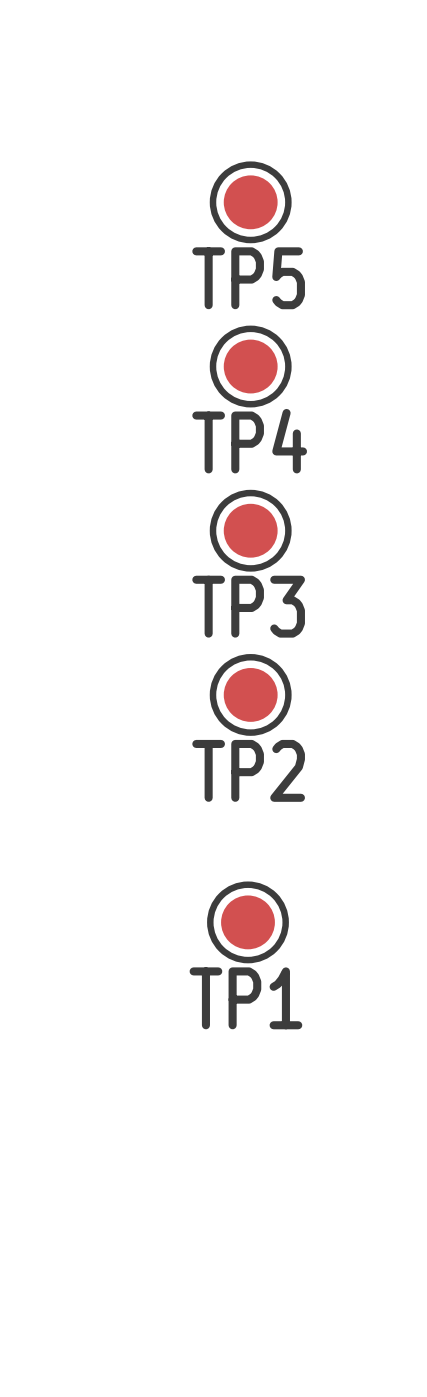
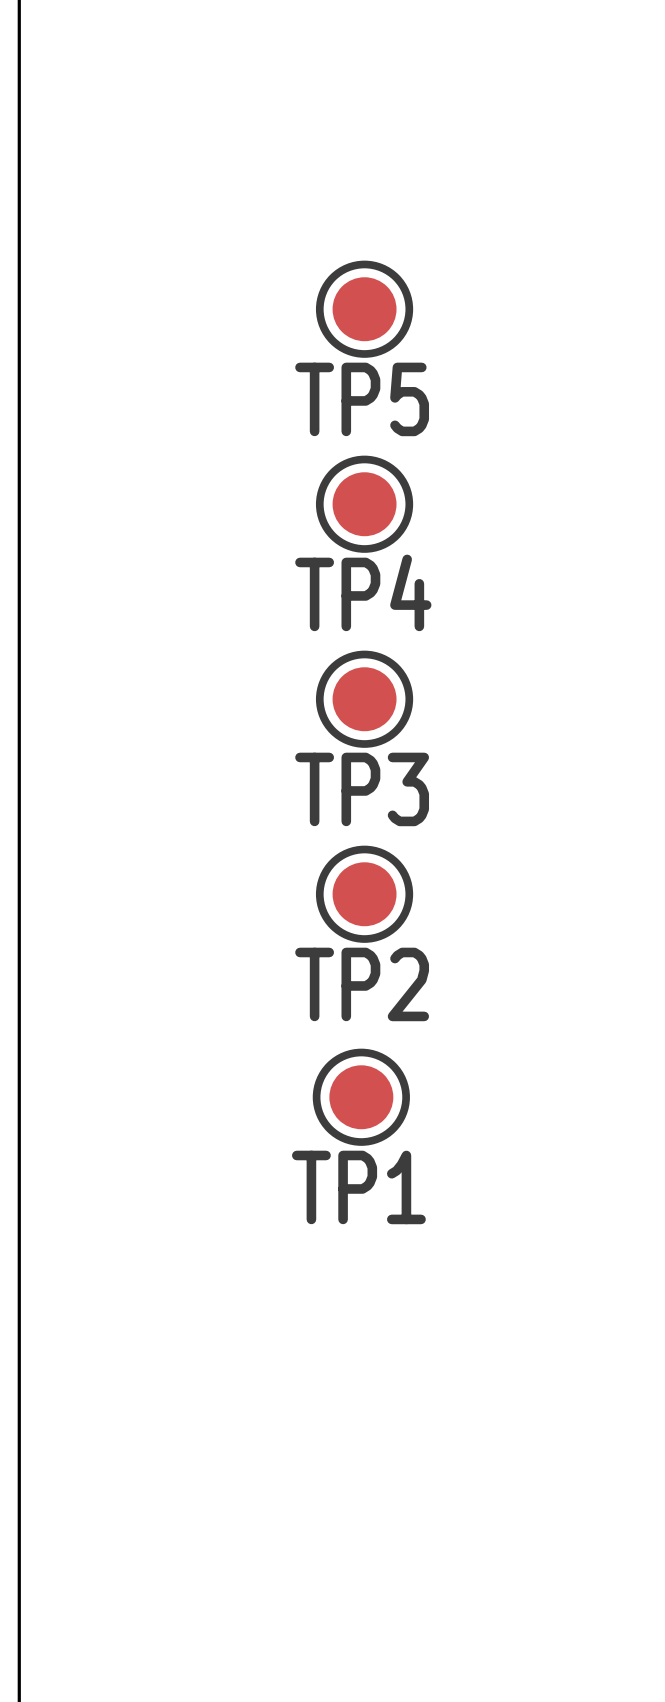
TP1 position: (247, 922) -> (361, 1097)

